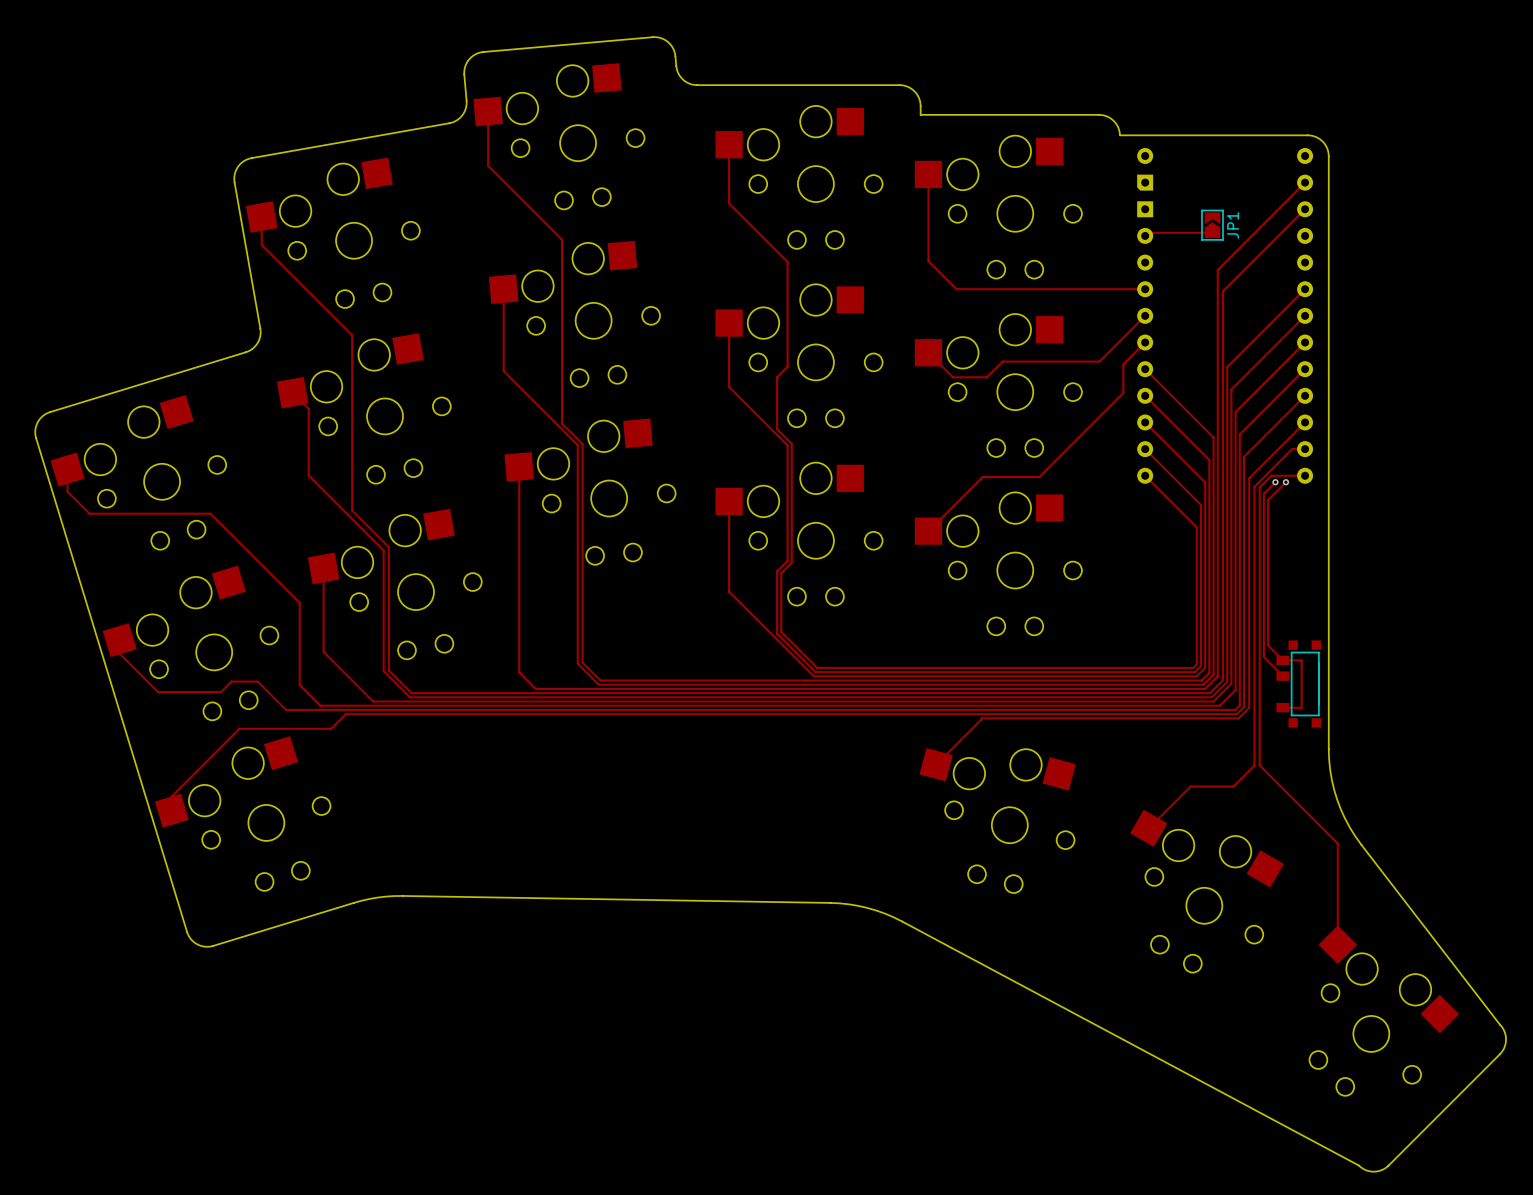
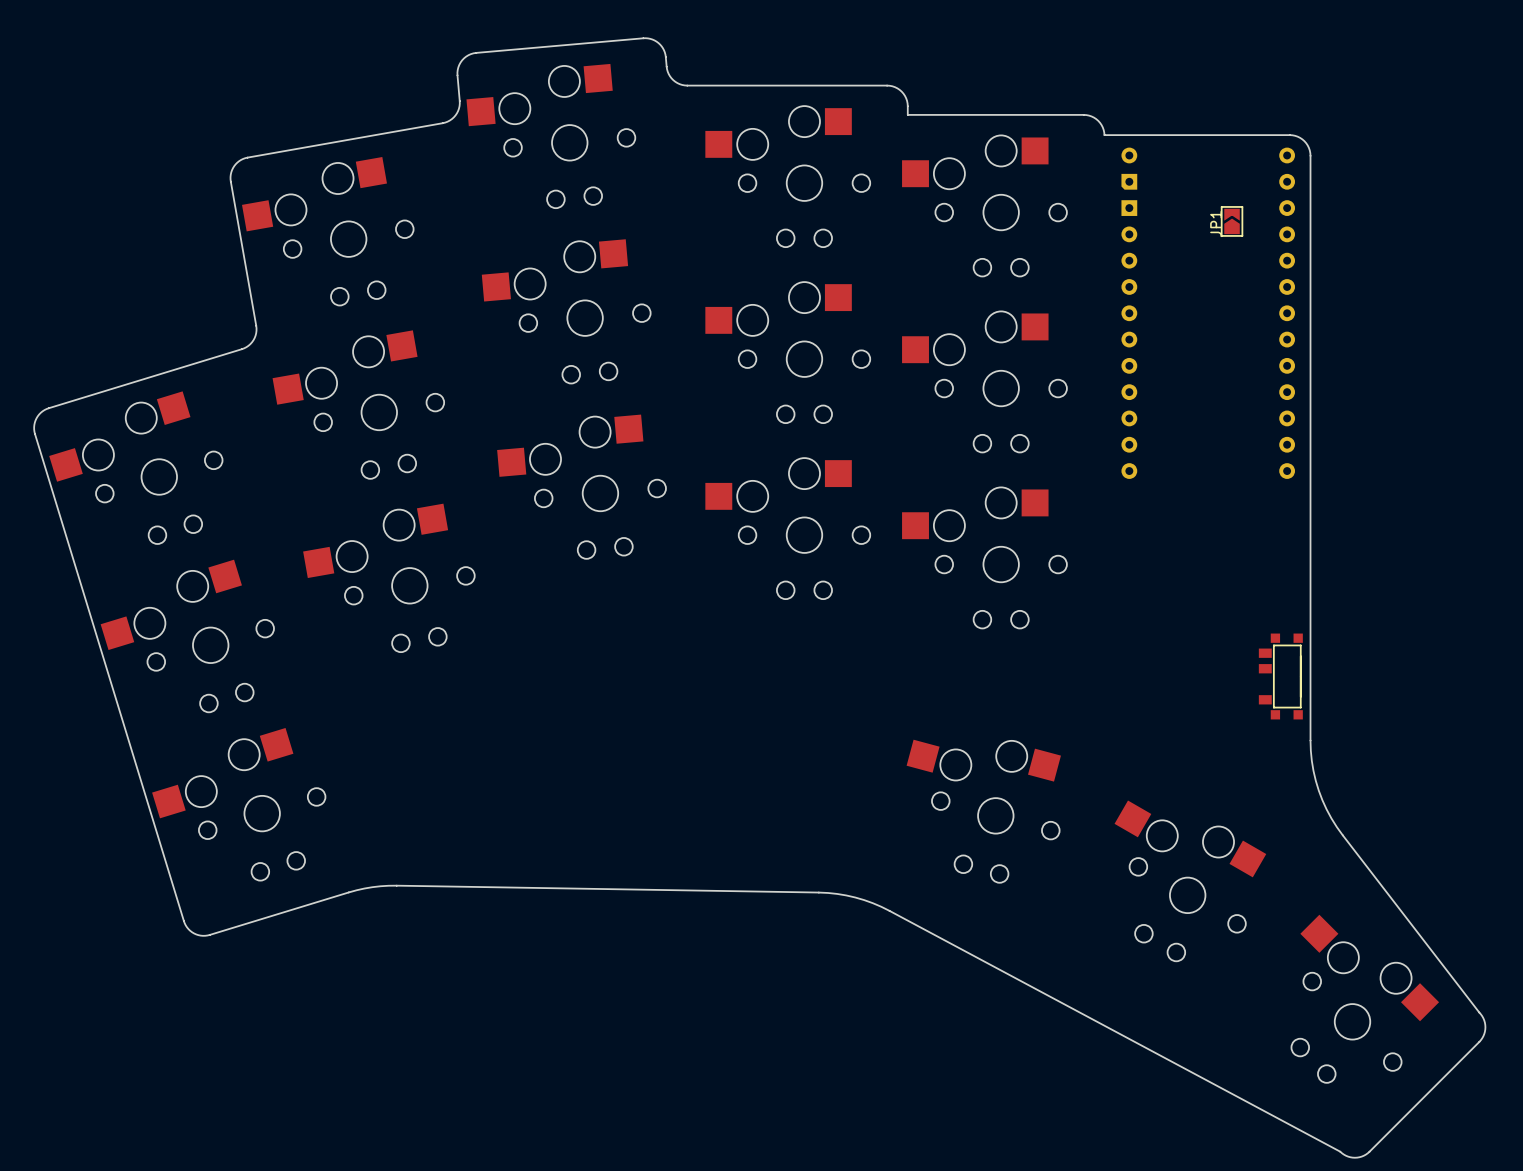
track: (488, 111) (488, 165) (562, 239) (562, 423) (582, 444) (582, 662) (600, 680) (1201, 680) (1209, 672) (1209, 460) (1145, 395) -> none
track: (729, 144) (729, 203) (787, 261) (787, 366) (777, 377) (777, 429) (791, 443) (791, 562) (781, 573) (781, 631) (817, 667) (1193, 667) (1196, 664) (1196, 527) (1145, 475) -> none
track: (928, 174) (928, 261) (956, 289) (1145, 289) -> none
track: (1305, 182) (1217, 269) (1217, 676) (1205, 688) (535, 688) (519, 672) (519, 466) -> none
track: (1305, 209) (1223, 291) (1223, 680) (1210, 693) (411, 693) (388, 670) (388, 547) (352, 510) (352, 335) (261, 244) (261, 217) -> none
JP1 position: (1212, 225) -> (1232, 221)
track: (1212, 232) (1148, 232) (1145, 235) -> none
track: (503, 289) (503, 371) (577, 445) (577, 663) (598, 684) (1203, 684) (1213, 674) (1213, 437) (1145, 369) -> none
track: (1305, 289) (1227, 367) (1227, 681) (1211, 697) (409, 697) (383, 671) (383, 550) (308, 475) (308, 408) (292, 392) -> none
track: (1145, 315) (1099, 361) (1002, 361) (986, 377) (952, 377) (928, 352) -> none
track: (1305, 315) (1231, 389) (1231, 683) (1213, 701) (373, 701) (323, 652) (323, 568) -> none
track: (729, 323) (729, 387) (787, 445) (787, 560) (777, 571) (777, 633) (815, 672) (1195, 672) (1200, 666) (1200, 504) (1145, 449) -> none
track: (1145, 342) (1123, 364) (1123, 393) (1039, 476) (982, 476) (928, 531) -> none
track: (1305, 342) (1235, 411) (1235, 689) (1219, 705) (320, 705) (299, 685) (299, 602) (210, 513) (89, 513) (67, 491) (67, 469) -> none
track: (1305, 369) (1239, 434) (1239, 705) (1235, 709) (286, 709) (257, 681) (231, 681) (221, 692) (158, 692) (119, 653) (119, 640) -> none
track: (1305, 395) (1243, 456) (1243, 707) (1237, 714) (345, 714) (331, 728) (239, 728) (171, 796) (171, 810) -> none
track: (1145, 422) (1205, 482) (1205, 667) (1196, 676) (813, 676) (729, 591) (729, 501) -> none
track: (1305, 422) (1249, 478) (1249, 707) (1238, 718) (981, 718) (936, 764) -> none
track: (1305, 449) (1292, 449) (1254, 486) (1254, 765) (1233, 786) (1190, 786) (1148, 828) -> none
track: (1305, 475) (1271, 475) (1259, 487) (1259, 765) (1337, 843) (1337, 944) -> none
track: (1275, 482) (1263, 493) (1263, 657) (1282, 676) -> none
via: (1275, 482) -> none
track: (1285, 482) (1268, 500) (1268, 645) (1282, 660) (1301, 660) (1301, 707) (1282, 707) -> none
via: (1285, 482) -> none

